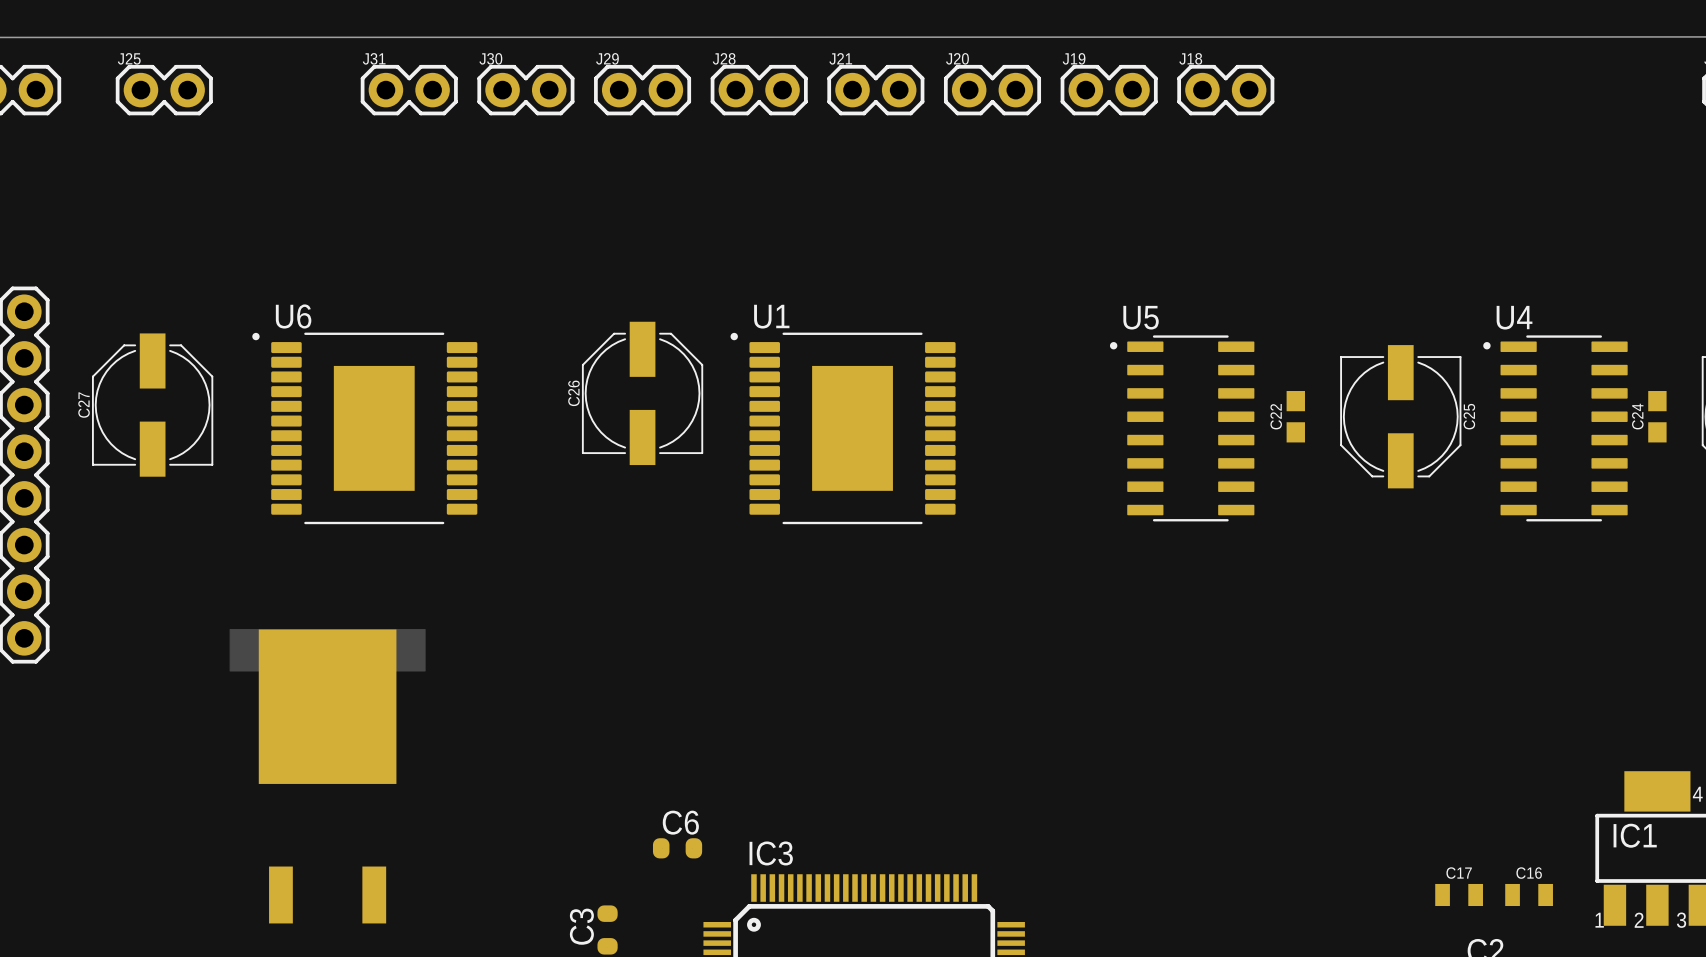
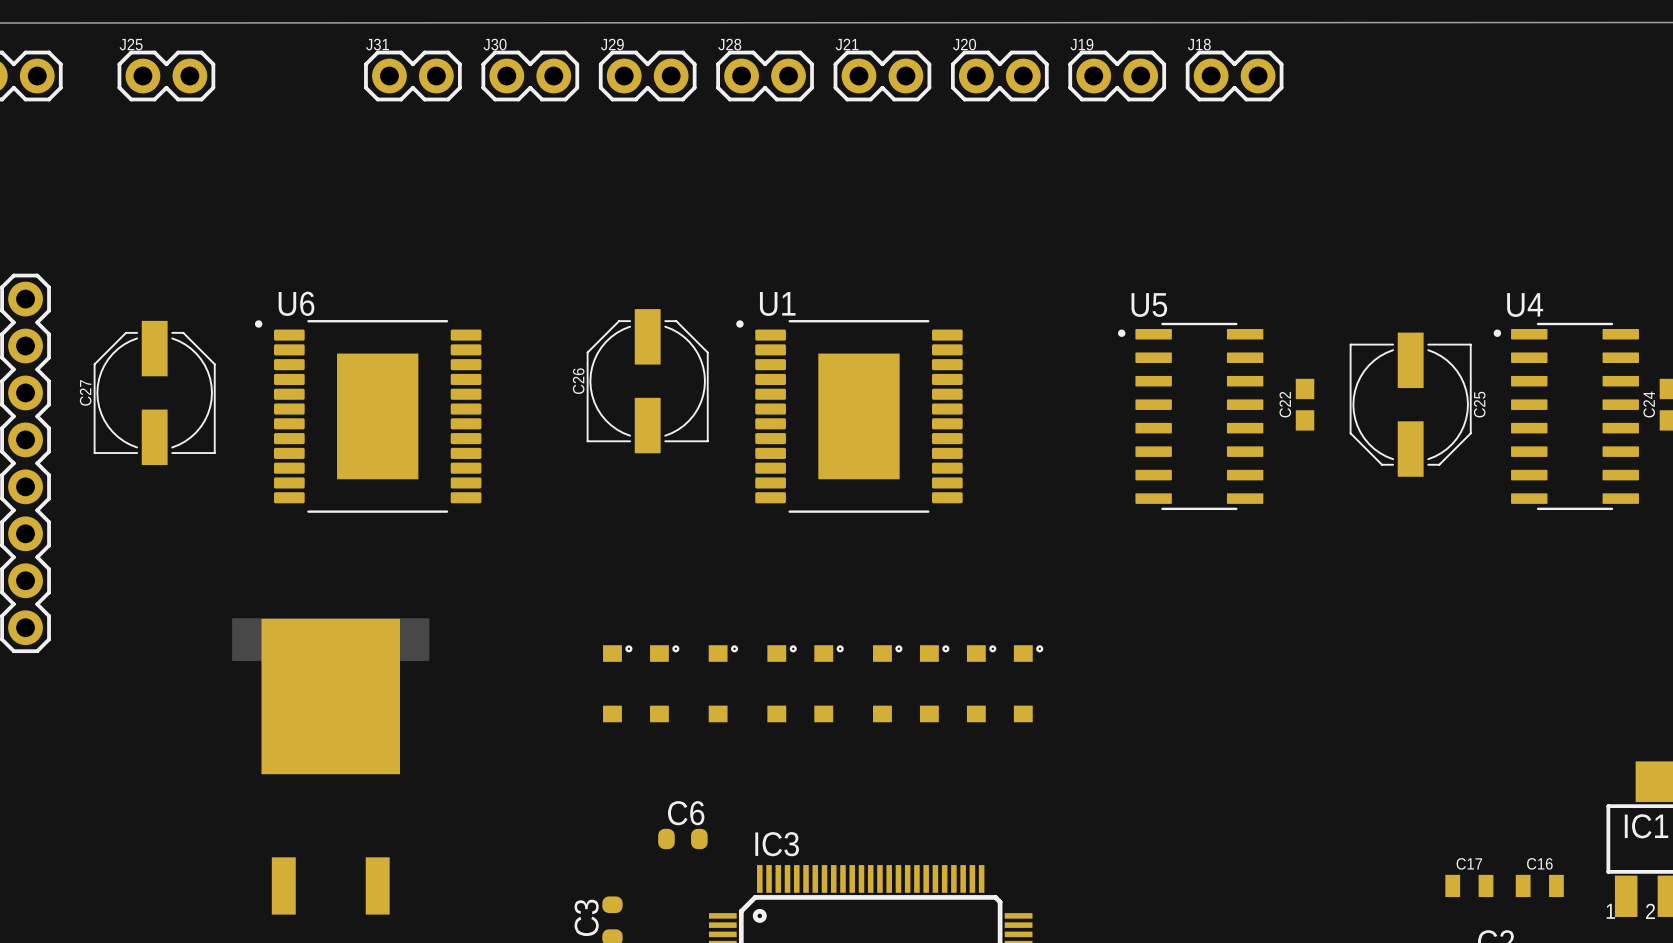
part: none -> (617, 683)
part: none -> (664, 683)
part: none -> (723, 683)
part: none -> (782, 683)
part: none -> (829, 683)
part: none -> (887, 683)
part: none -> (934, 683)
part: none -> (981, 683)
part: none -> (1028, 683)

